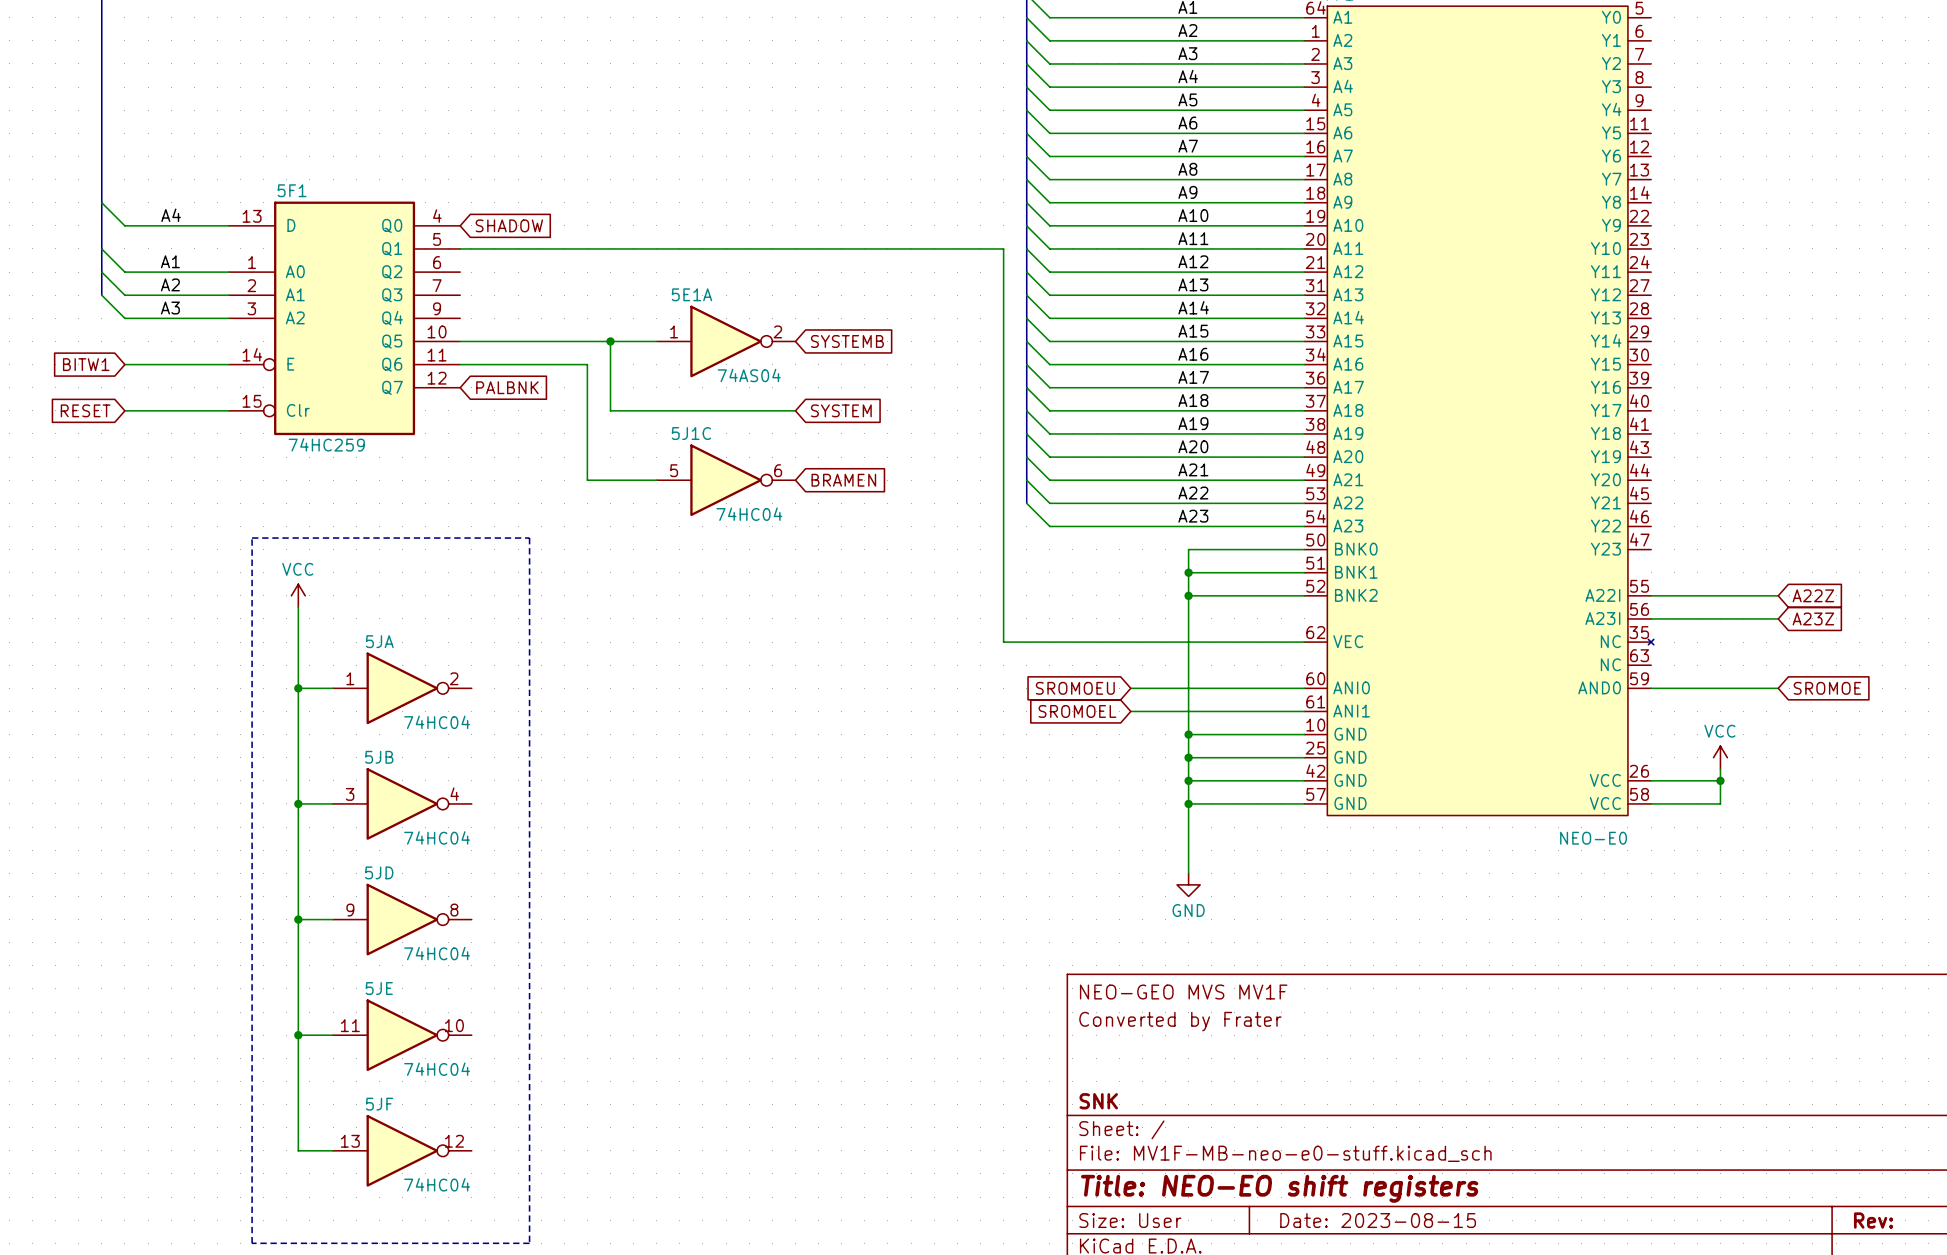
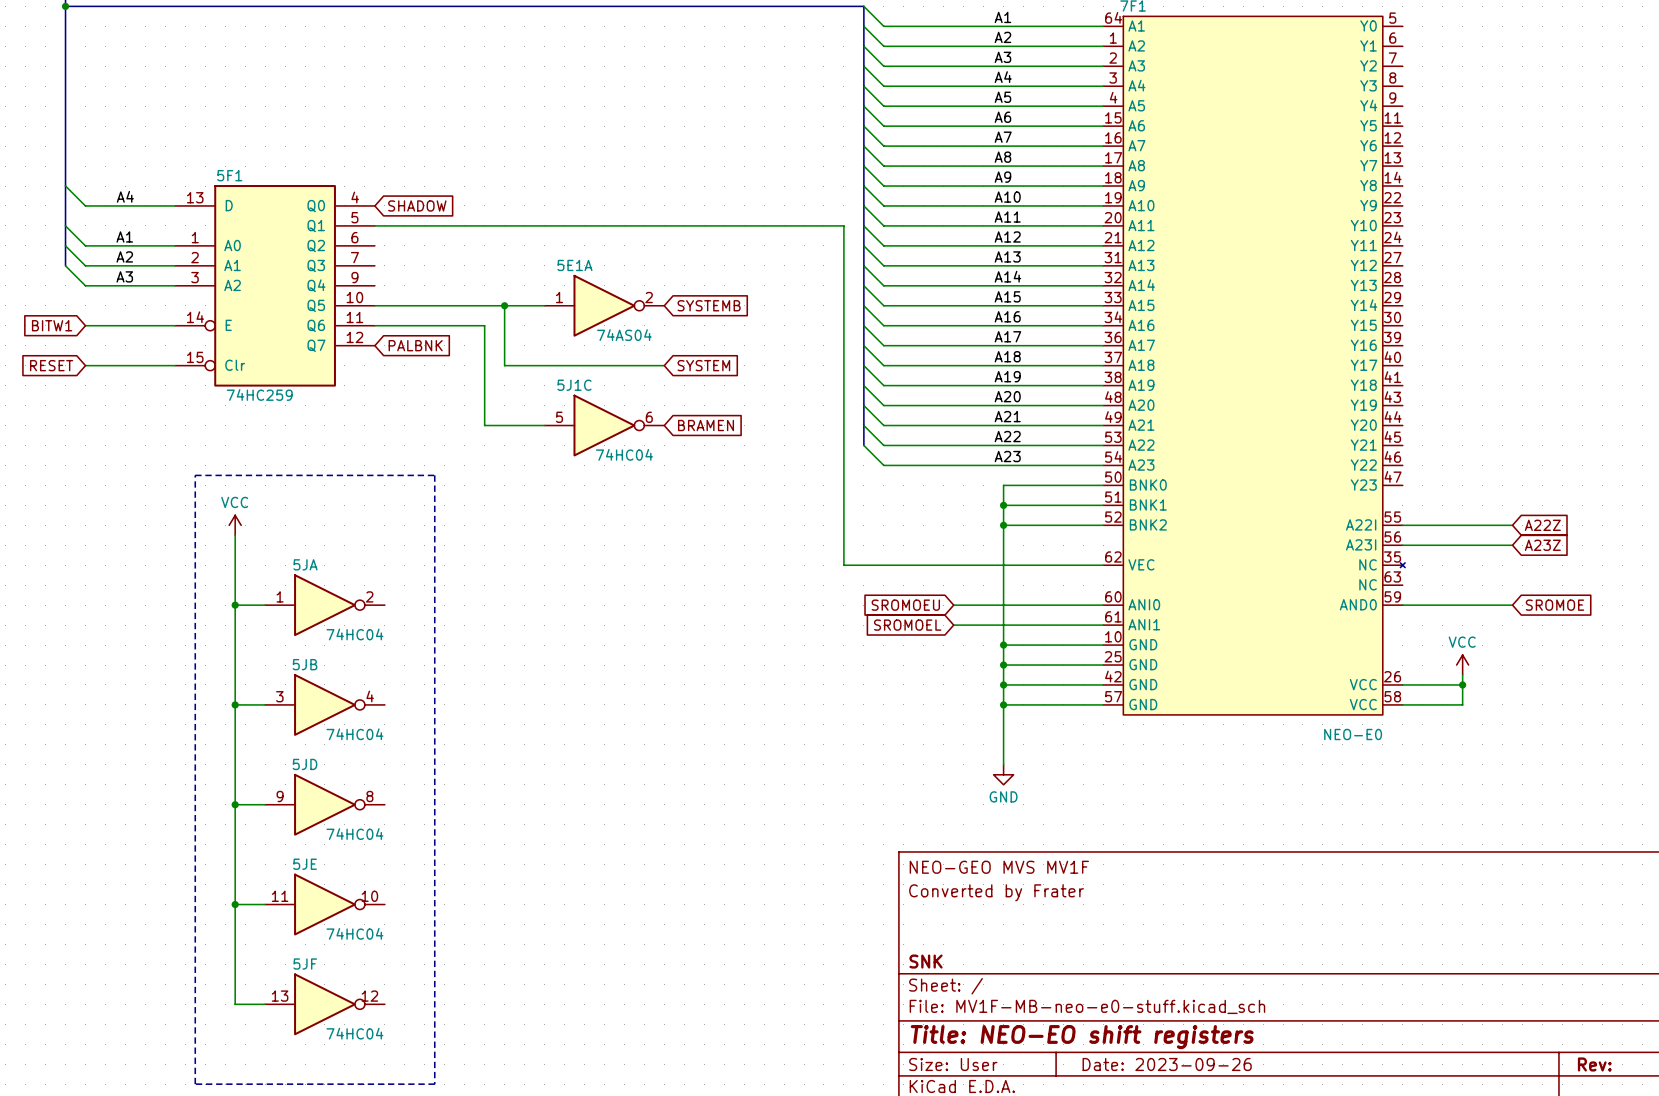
title block: Date: 2023-08-15 (1378, 1220) -> Date: 2023-09-26 (1167, 1064)

